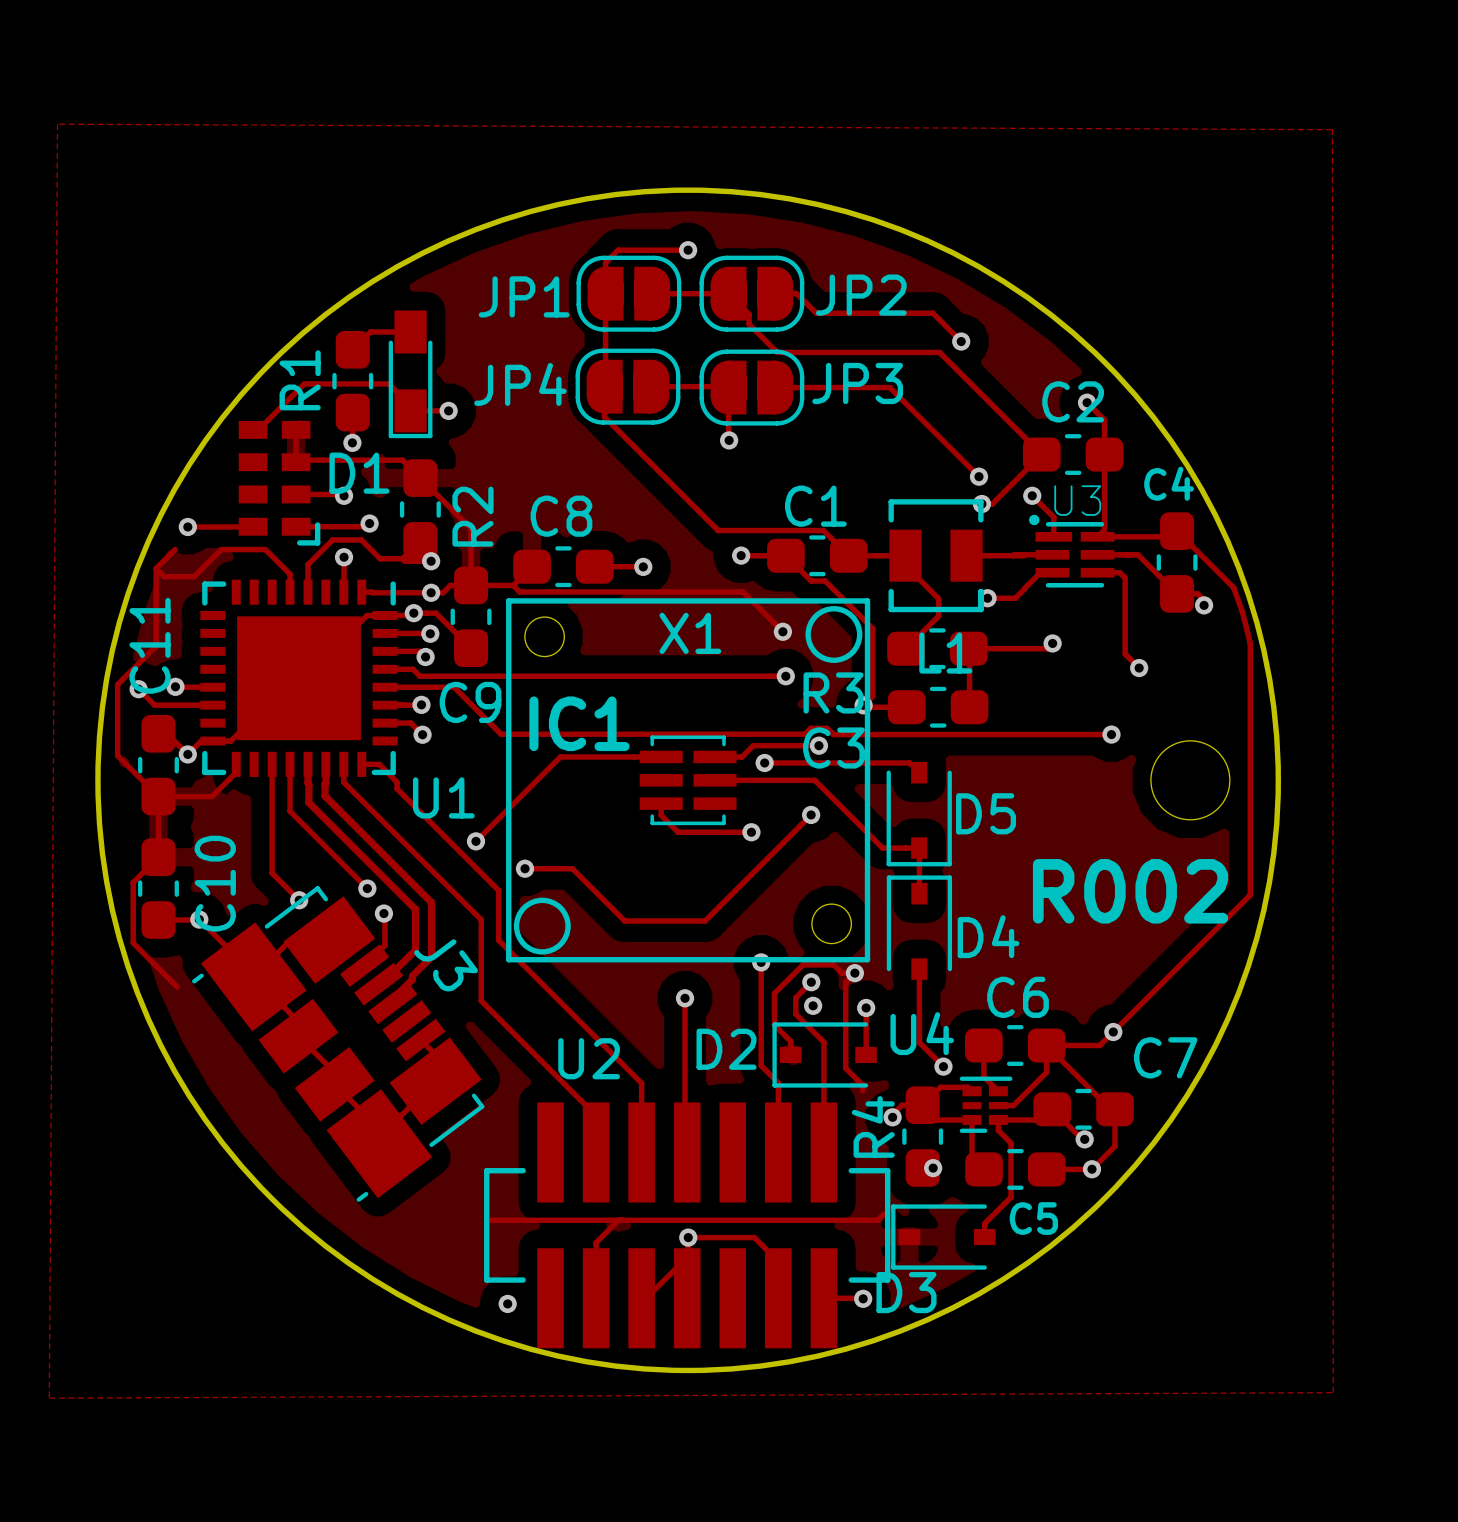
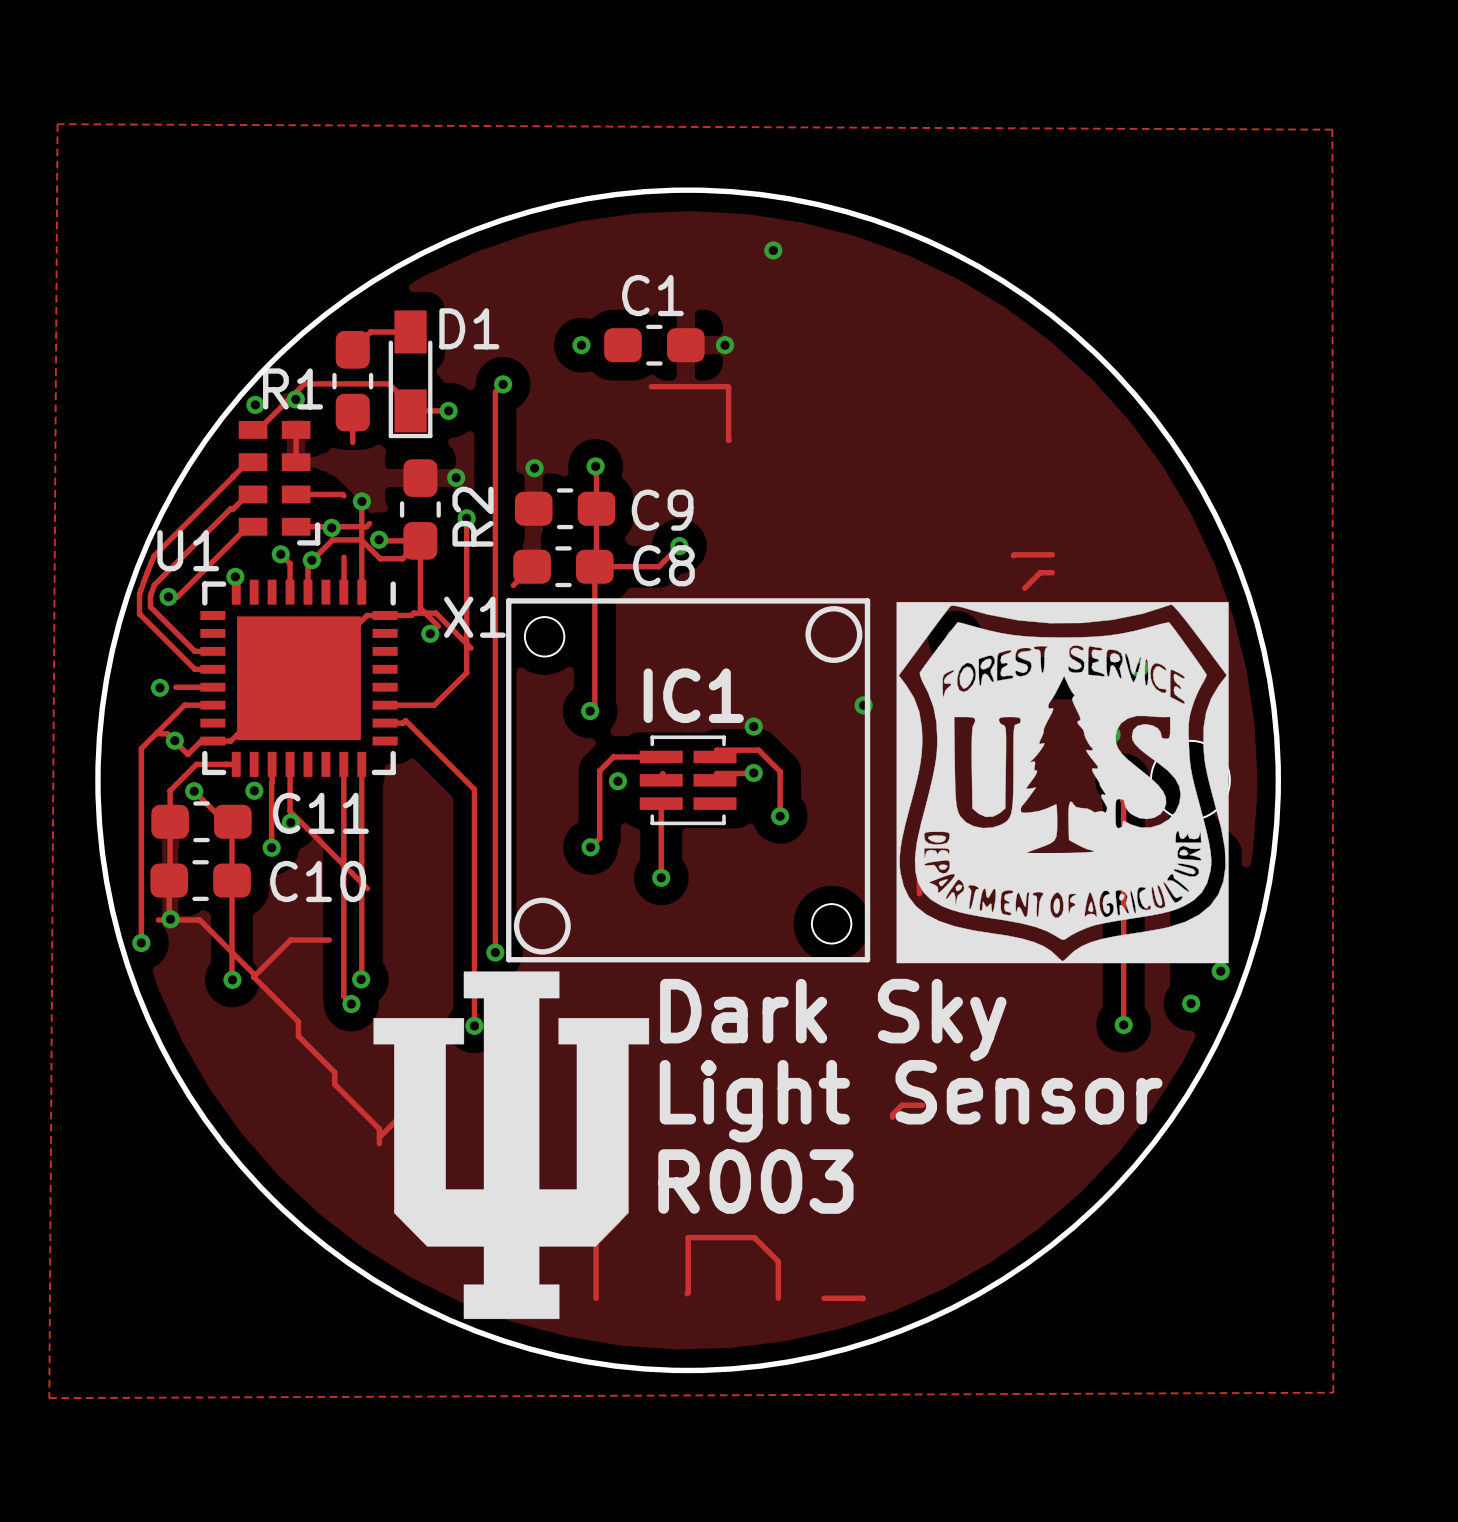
track: (688, 250) (618, 250) (605, 262) (604, 417) (718, 530) (823, 530) (848, 555) (905, 555) (905, 565) (938, 598) (938, 616) (906, 648) -> none
via: (688, 250) -> none
via: none -> (773, 250)
JP1: (628, 293) -> none
track: (652, 293) (728, 293) (749, 314) (749, 324) (777, 352) (939, 352) (1041, 454) (992, 504) (981, 504) -> none
JP2: (751, 293) -> none
track: (775, 293) (796, 293) (816, 313) (932, 313) (961, 341) -> none
via: (961, 341) -> none
via: none -> (581, 345)
via: none -> (725, 345)
R1 name rotation: 0° (300, 380) -> 90° clockwise (293, 388)
track: none -> (503, 384) (495, 392) (495, 952)
via: none -> (503, 384)
JP4: (627, 386) -> none
JP3: (751, 387) -> none
track: (775, 387) (889, 387) (979, 476) -> none
via: none -> (295, 399)
track: (1087, 402) (1104, 420) (1104, 529) (1097, 536) (1171, 536) (1177, 531) (1233, 587) (1242, 612) (1250, 643) (1250, 895) (1099, 1045) (1046, 1045) -> none
via: (1087, 402) -> none
via: none -> (255, 404)
via: (729, 440) -> none
via: (352, 442) -> none
C2: (1073, 454) -> none
track: none -> (253, 462) (247, 462) (154, 556) (139, 594) (139, 613) (194, 669) (212, 669)
track: (296, 462) (298, 460) (402, 460) (471, 528) (471, 585) -> none
track: none -> (595, 466) (594, 706) (590, 711)
via: none -> (595, 466)
via: none -> (534, 468)
D1 name position: D1 (359, 473) -> D1 (469, 328)
via: (979, 476) -> none
via: none -> (456, 477)
track: none -> (253, 494) (247, 494) (233, 508) (230, 508) (154, 585) (150, 596) (150, 606) (194, 651) (212, 651)
via position: (344, 495) -> (361, 501)
track: (1032, 495) (1053, 517) (1053, 536) -> none
via: (1032, 495) -> none
via: (981, 504) -> none
C8 name position: C8 (561, 516) -> C8 (663, 565)
track: none -> (466, 518) (466, 672) (434, 705) (421, 705)
via: none -> (466, 518)
via position: (369, 523) -> (379, 539)
track: (187, 526) (252, 526) -> (168, 596) (177, 596) (247, 526) (253, 526)
via: (187, 526) -> none
via: none -> (331, 527)
track: none -> (379, 539) (420, 540) (420, 608) (438, 626)
track: none -> (679, 546) (658, 566) (643, 566)
via: none -> (679, 546)
track: (175, 549) (156, 568) -> none
U3: (1071, 551) -> none
via: none -> (280, 554)
track: (1024, 554) (966, 555) -> none
track: (1097, 554) (1137, 554) (1177, 593) (1197, 593) (1204, 600) (1204, 605) -> none
track: (741, 555) (785, 555) (811, 581) (825, 581) (872, 628) (872, 696) (863, 705) (865, 707) (906, 707) -> none
via: (741, 555) -> none
C1 position: (817, 555) -> (654, 345)
L1: (936, 555) -> none
via: (344, 557) -> none
track: (402, 558) (404, 561) (431, 561) -> none
via: none -> (311, 560)
via: (431, 561) -> none
C4: (1177, 562) -> none
via: (643, 566) -> none
track: (156, 568) (164, 576) (194, 576) (221, 549) (265, 549) (290, 574) -> (280, 554) (290, 563) (290, 574)
track: (156, 568) (156, 645) (117, 684) (117, 755) (158, 796) -> none
track: (1097, 572) (1119, 572) (1125, 578) (1125, 654) (1139, 668) -> none
via: none -> (235, 576)
track: (1024, 588) (1015, 598) (987, 598) -> none
track: (361, 592) (443, 592) (450, 585) (513, 585) (519, 591) (743, 591) (782, 631) -> (361, 592) (361, 501)
via: (431, 592) -> none
via: none -> (168, 596)
via: (987, 598) -> none
drawing: none -> [896, 601, 1229, 964]
via: (1204, 605) -> none
via: (413, 613) -> none
C9 rotation: 0° (471, 616) -> 90° clockwise (565, 508)
C9 position: (471, 616) -> (565, 508)
via: (782, 631) -> none
track: (385, 633) (429, 633) -> none
X1 name position: X1 (690, 633) -> X1 (474, 617)
track: (1052, 643) (1047, 648) (968, 648) (969, 707) -> none
via: (1052, 643) -> none
R3: (937, 648) -> none
track: (385, 651) (419, 651) (425, 657) -> none
via: (425, 657) -> none
track: (385, 669) (413, 669) (420, 676) (785, 676) -> none
via: (785, 676) -> none
via position: (175, 686) -> (159, 687)
track: (385, 687) (454, 687) (501, 734) (804, 734) (810, 728) (827, 728) (833, 734) (1111, 734) -> none
track: (138, 689) (154, 705) (184, 705) -> (141, 942) (141, 748) (184, 705)
via: (138, 689) -> none
C9 name position: C9 (470, 702) -> C9 (662, 510)
via: (421, 704) -> none
C3: (938, 707) -> none
via: none -> (590, 711)
track: (403, 723) (410, 723) (422, 734) -> (403, 723) (405, 720) (474, 789) (474, 1025)
IC1 name position: IC1 (579, 723) -> IC1 (693, 695)
via: none -> (753, 726)
via: (422, 734) -> none
track: (818, 745) (753, 745) (742, 757) (715, 757) -> (780, 816) (780, 771) (758, 750) (716, 750) (715, 757)
via: (818, 745) -> none
via position: (187, 754) -> (174, 740)
track: (613, 757) (560, 757) (475, 841) -> (613, 757) (599, 770) (599, 838) (590, 847)
track: (764, 763) (909, 763) (911, 764) -> none
via position: (764, 763) -> (753, 773)
track: (236, 764) (236, 772) (212, 796) (158, 796) -> (236, 764) (196, 764) (170, 790) (170, 919)
track: (307, 764) (308, 802) (415, 909) (415, 950) (381, 984) (378, 984) -> none
track: (325, 764) (325, 796) (431, 902) (431, 956) (392, 999) (392, 1002) -> none
track: (361, 764) (379, 764) (397, 782) (397, 788) (498, 890) (498, 940) (641, 1083) (641, 1152) -> (361, 764) (361, 979)
C11 rotation: 0° (158, 765) -> 90° clockwise (201, 821)
C11 position: (158, 765) -> (201, 821)
track: none -> (663, 773) (662, 774)
track: (715, 780) (814, 780) (882, 848) (919, 848) -> (715, 780) (716, 773) (753, 773)
via: none -> (617, 781)
track: (272, 782) (272, 873) (299, 900) -> (271, 782) (271, 847)
track: (343, 782) (481, 919) (481, 1000) (596, 1115) (596, 1152) -> (343, 782) (343, 996) (351, 1004)
track: none -> (1125, 783) (1122, 780) (1123, 1024)
via: none -> (254, 790)
track: none -> (194, 791) (224, 821) (232, 821) (231, 979)
via: none -> (194, 791)
track: (158, 796) (158, 857) (133, 882) (133, 943) (177, 986) -> none
U1 name position: U1 (443, 797) -> U1 (188, 550)
track: (811, 814) (705, 921) (624, 921) (572, 868) (525, 868) -> none
via: (811, 814) -> none
D5: (919, 814) -> none
track: (661, 815) (678, 832) (751, 832) -> (661, 815) (661, 877)
via: none -> (780, 816)
via: none -> (290, 822)
via: (751, 832) -> none
via: (475, 841) -> none
via: none -> (271, 847)
via: none -> (590, 847)
via: (525, 868) -> none
via: none -> (661, 877)
C10 rotation: 0° (158, 888) -> 90° clockwise (200, 880)
via: (367, 888) -> none
text: R002 (1130, 891) -> none
via: (299, 900) -> none
track: (383, 913) (384, 945) (364, 965) -> none
via: (383, 913) -> none
via position: (199, 919) -> (170, 919)
D4: (919, 927) -> none
via: none -> (141, 942)
via: none -> (495, 952)
track: (761, 962) (761, 1065) (778, 1082) (778, 1152) -> none
via: (761, 962) -> none
track: (919, 969) (919, 1042) (943, 1066) -> none
drawing: none -> [373, 971, 650, 1320]
via: none -> (1220, 971)
via: (854, 973) -> none
via: none -> (232, 979)
via: none -> (361, 979)
track: (811, 982) (795, 997) (795, 1014) (823, 1042) (823, 1152) -> none
via: (811, 982) -> none
track: (685, 998) (685, 1150) (687, 1152) -> none
via: (685, 998) -> none
via: none -> (1191, 1003)
via: none -> (351, 1004)
via: (813, 1005) -> none
track: (866, 1007) (866, 1054) -> none
via: (866, 1007) -> none
text: none -> Dark Sky (833, 1020)
via: none -> (474, 1025)
via position: (1113, 1032) -> (1123, 1024)
J3: (338, 1043) -> none
track: (983, 1045) (983, 1076) (998, 1091) -> none
C6: (1015, 1045) -> none
track: (1046, 1045) (1110, 1109) (1115, 1109) (1115, 1146) (1091, 1169) (1046, 1169) -> none
track: (1046, 1045) (1046, 1072) (1013, 1105) (998, 1105) -> none
track: (790, 1054) (790, 1041) (774, 1025) (774, 993) (803, 964) (833, 964) (842, 973) (854, 973) (845, 982) (845, 1068) (862, 1085) (862, 1090) -> none
D2: (824, 1054) -> none
via: (943, 1066) -> none
track: (971, 1091) (968, 1087) (940, 1087) (922, 1105) (937, 1119) (971, 1119) (971, 1157) (984, 1169) -> none
text: none -> Light Sensor (911, 1101)
U4: (986, 1104) -> none
C7: (1083, 1109) -> none
via: (892, 1117) -> none
R4: (922, 1136) -> none
track: (1084, 1139) (1082, 1139) (1052, 1109) (1041, 1119) (998, 1119) (998, 1130) (1011, 1143) (1011, 1197) (984, 1223) (984, 1237) -> none
via: (1084, 1139) -> none
via: (933, 1168) -> none
C5: (1015, 1169) -> none
via: (1092, 1169) -> none
text: none -> R003 (755, 1181)
track: (883, 1214) (877, 1220) (486, 1220) -> none
U2: (687, 1225) -> none
via: (688, 1237) -> none
D3: (943, 1237) -> none
track: (688, 1256) (650, 1293) -> none
via: (863, 1298) -> none
via: (507, 1303) -> none

